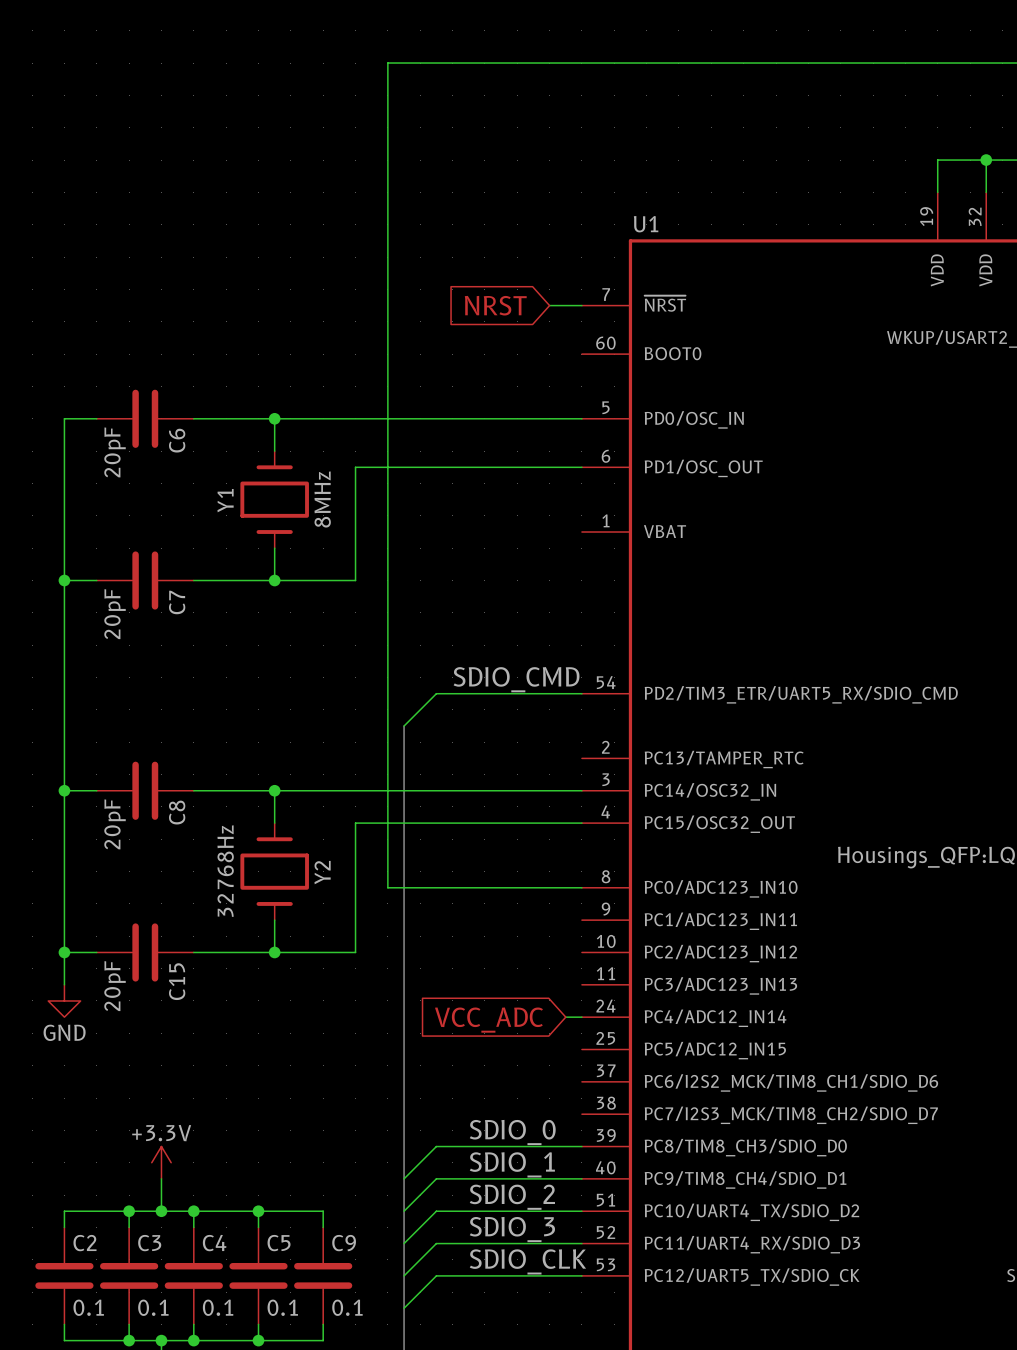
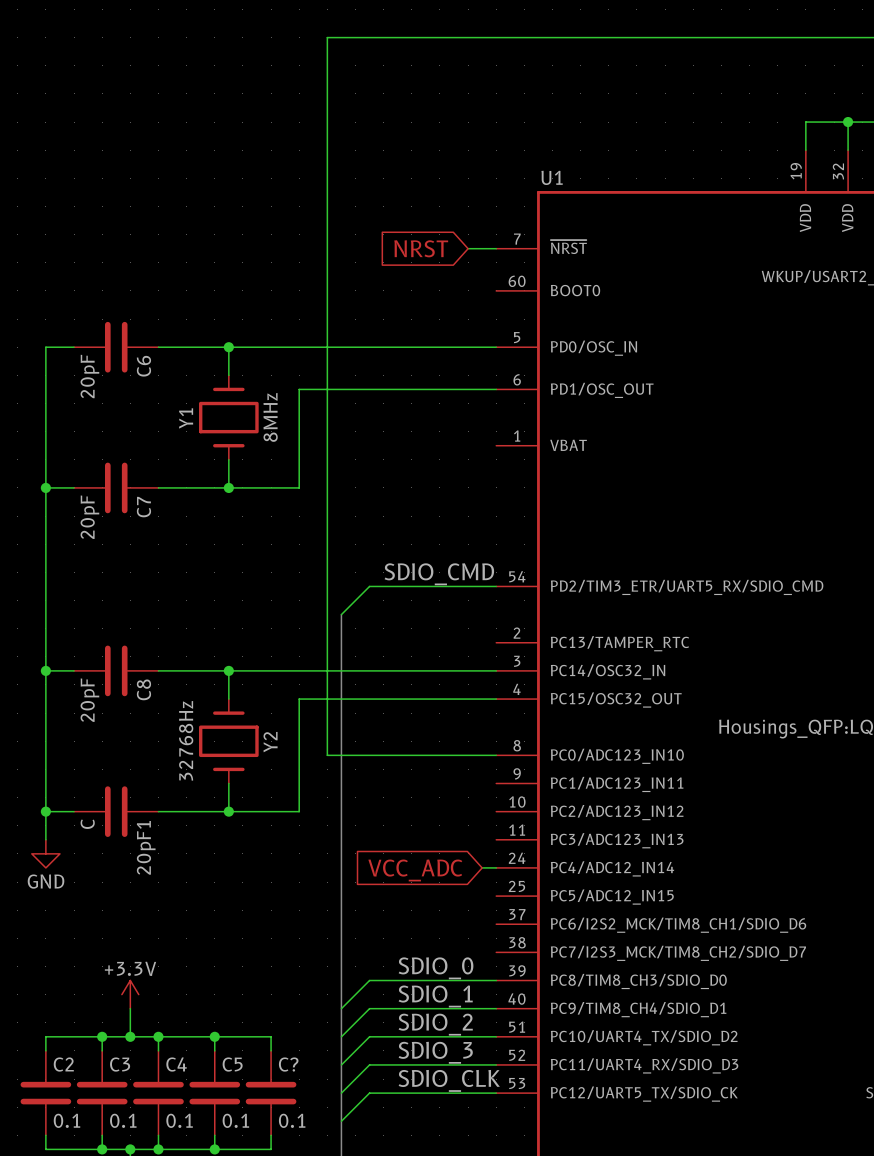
C15 name: C15 (177, 981) -> 20pF1 (146, 847)
C15 value: 20pF (115, 986) -> C (87, 824)
C9 name: C9 (344, 1243) -> C? (288, 1064)

